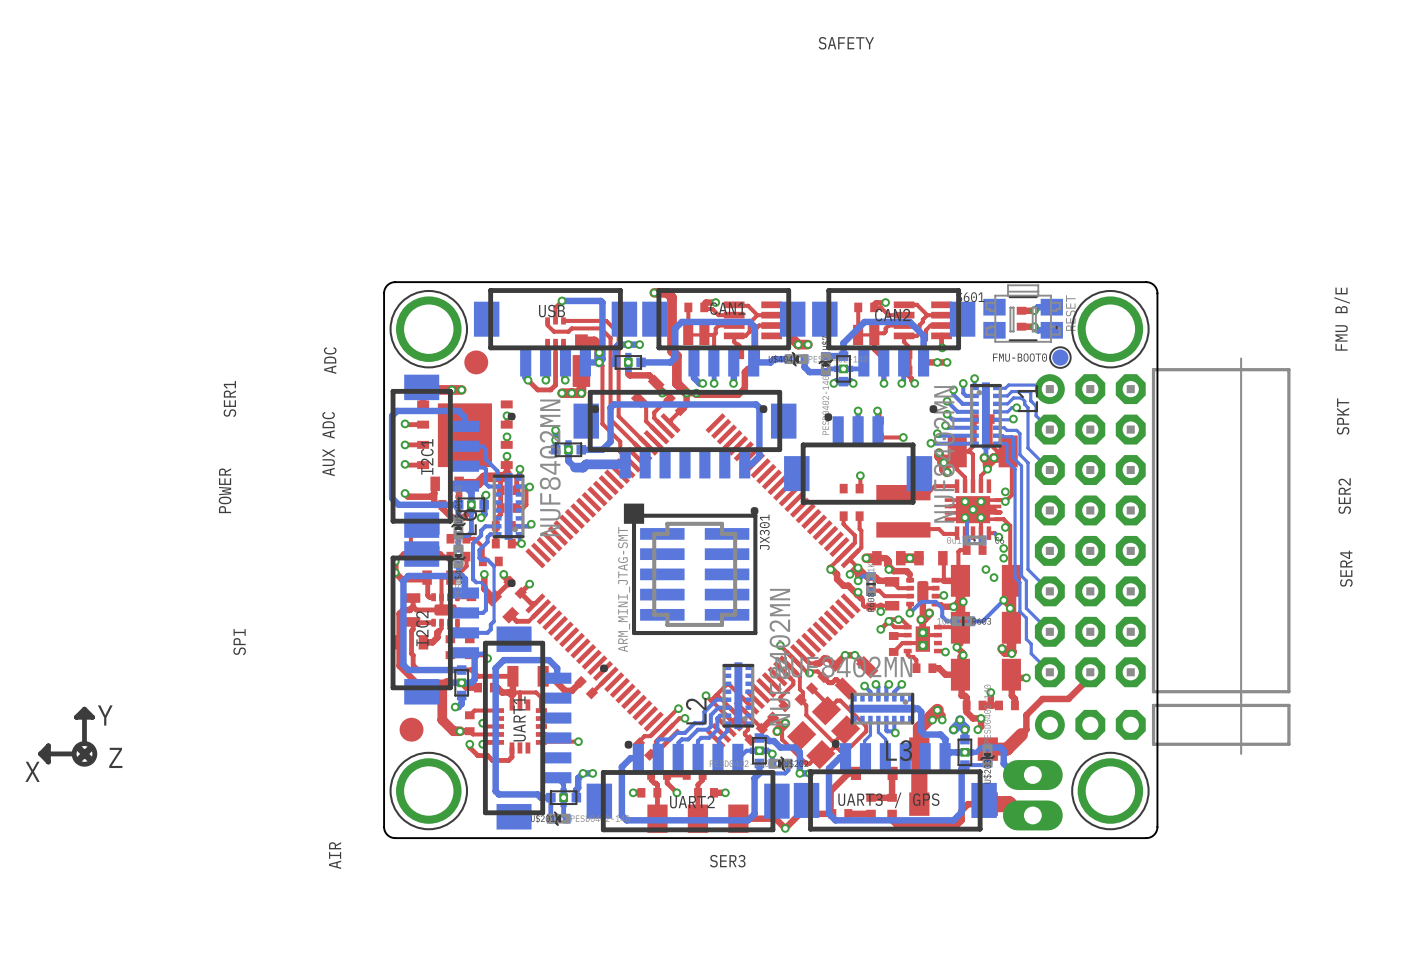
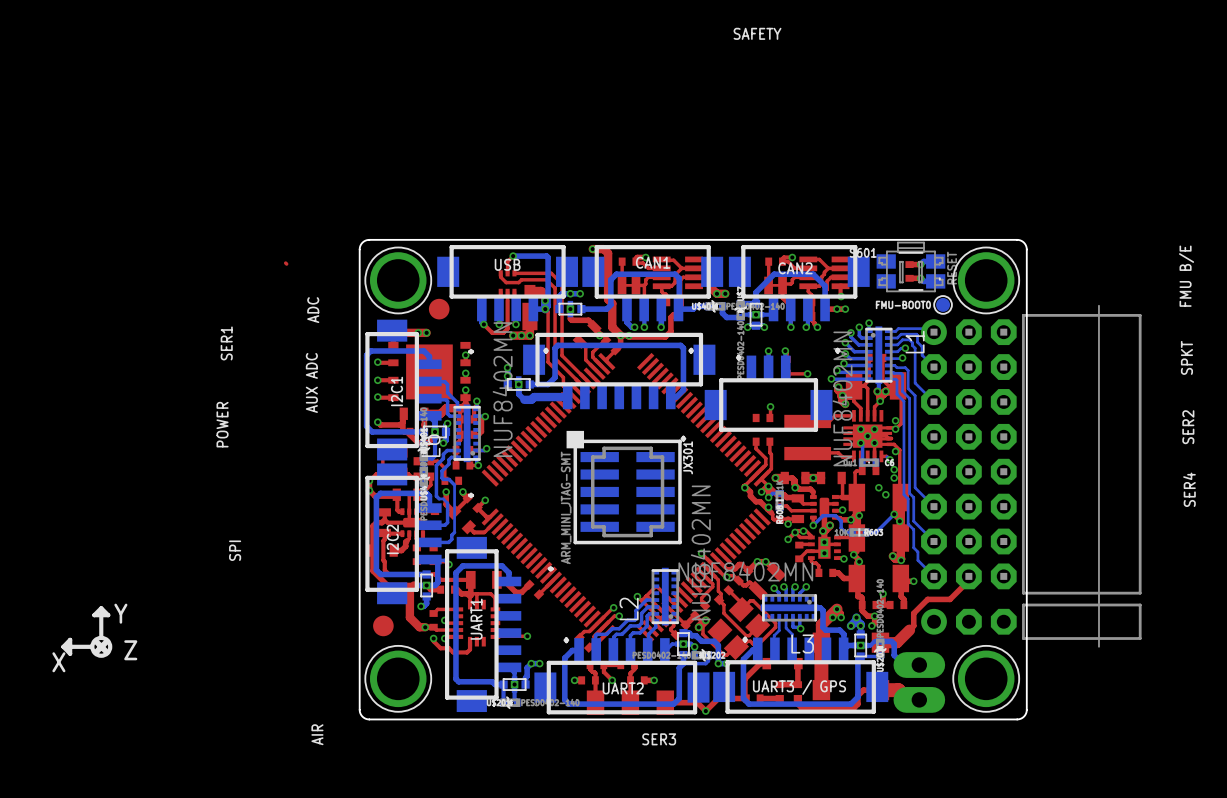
top track: none -> (285, 263) (286, 264)

